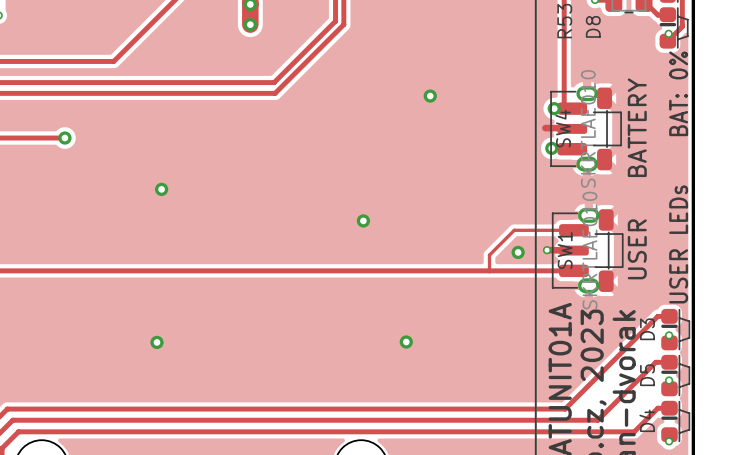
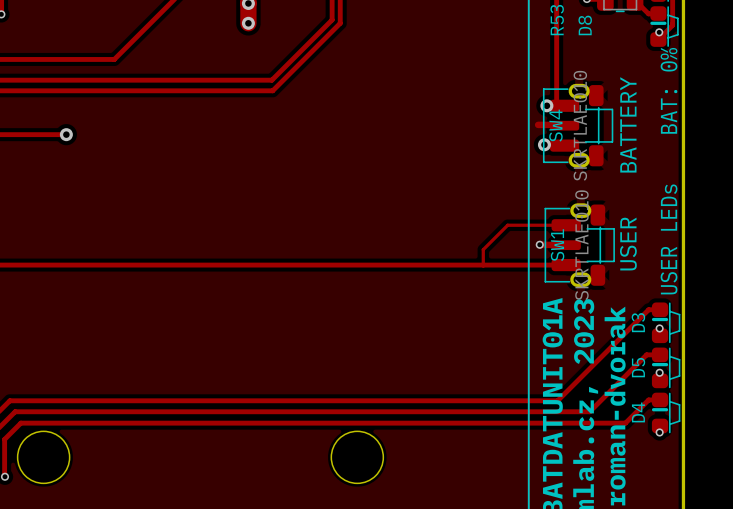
via: (430, 96) -> none
via: (161, 189) -> none
via: (363, 220) -> none
via: (518, 252) -> none
via: (406, 341) -> none
via: (156, 342) -> none

